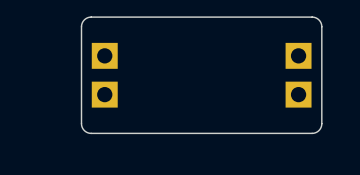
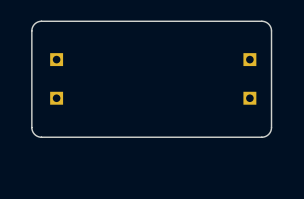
part footprint: [91, 42, 118, 69] -> [50, 53, 64, 67]
part footprint: [285, 42, 312, 69] -> [243, 53, 257, 67]
part footprint: [91, 81, 118, 108] -> [50, 91, 64, 105]
part footprint: [285, 81, 312, 108] -> [243, 91, 257, 105]

